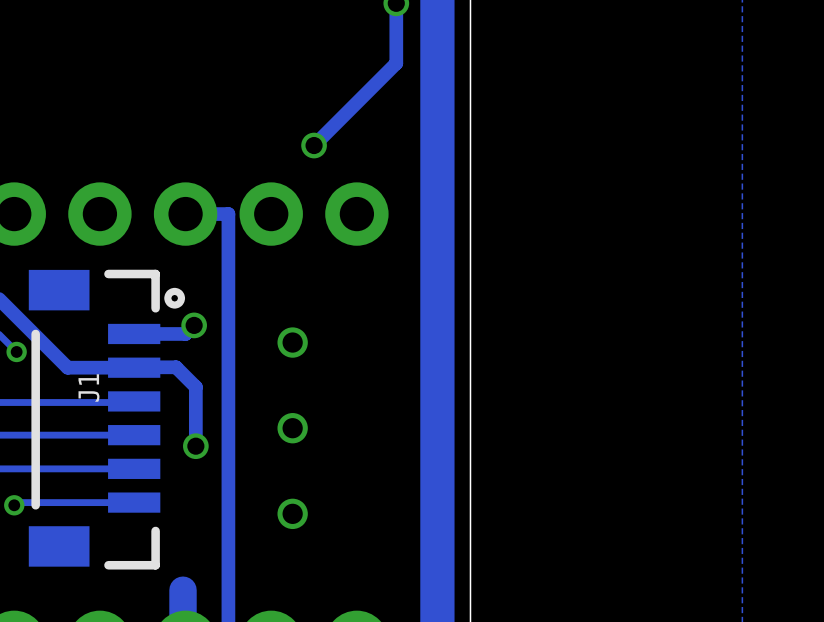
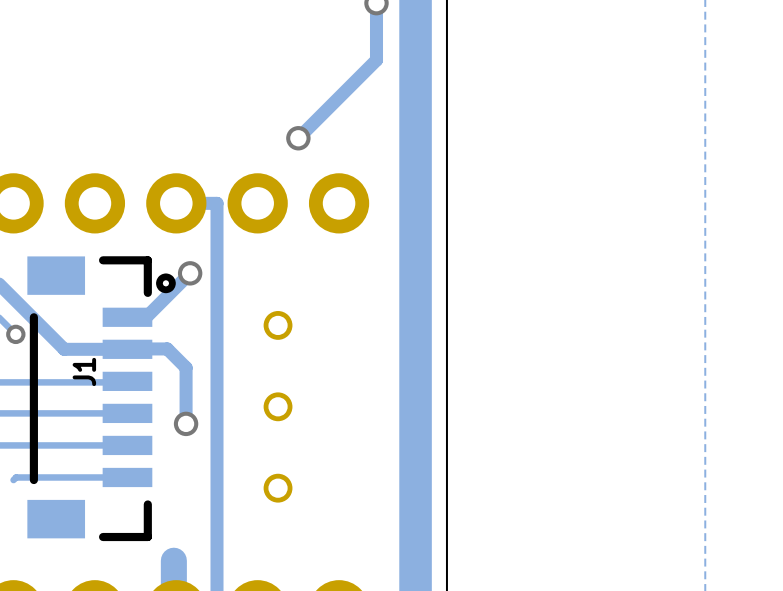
track: (194, 325) (185, 333) (153, 333) -> (190, 273) (146, 317)
via position: (194, 325) -> (190, 273)
via: (14, 505) -> none

